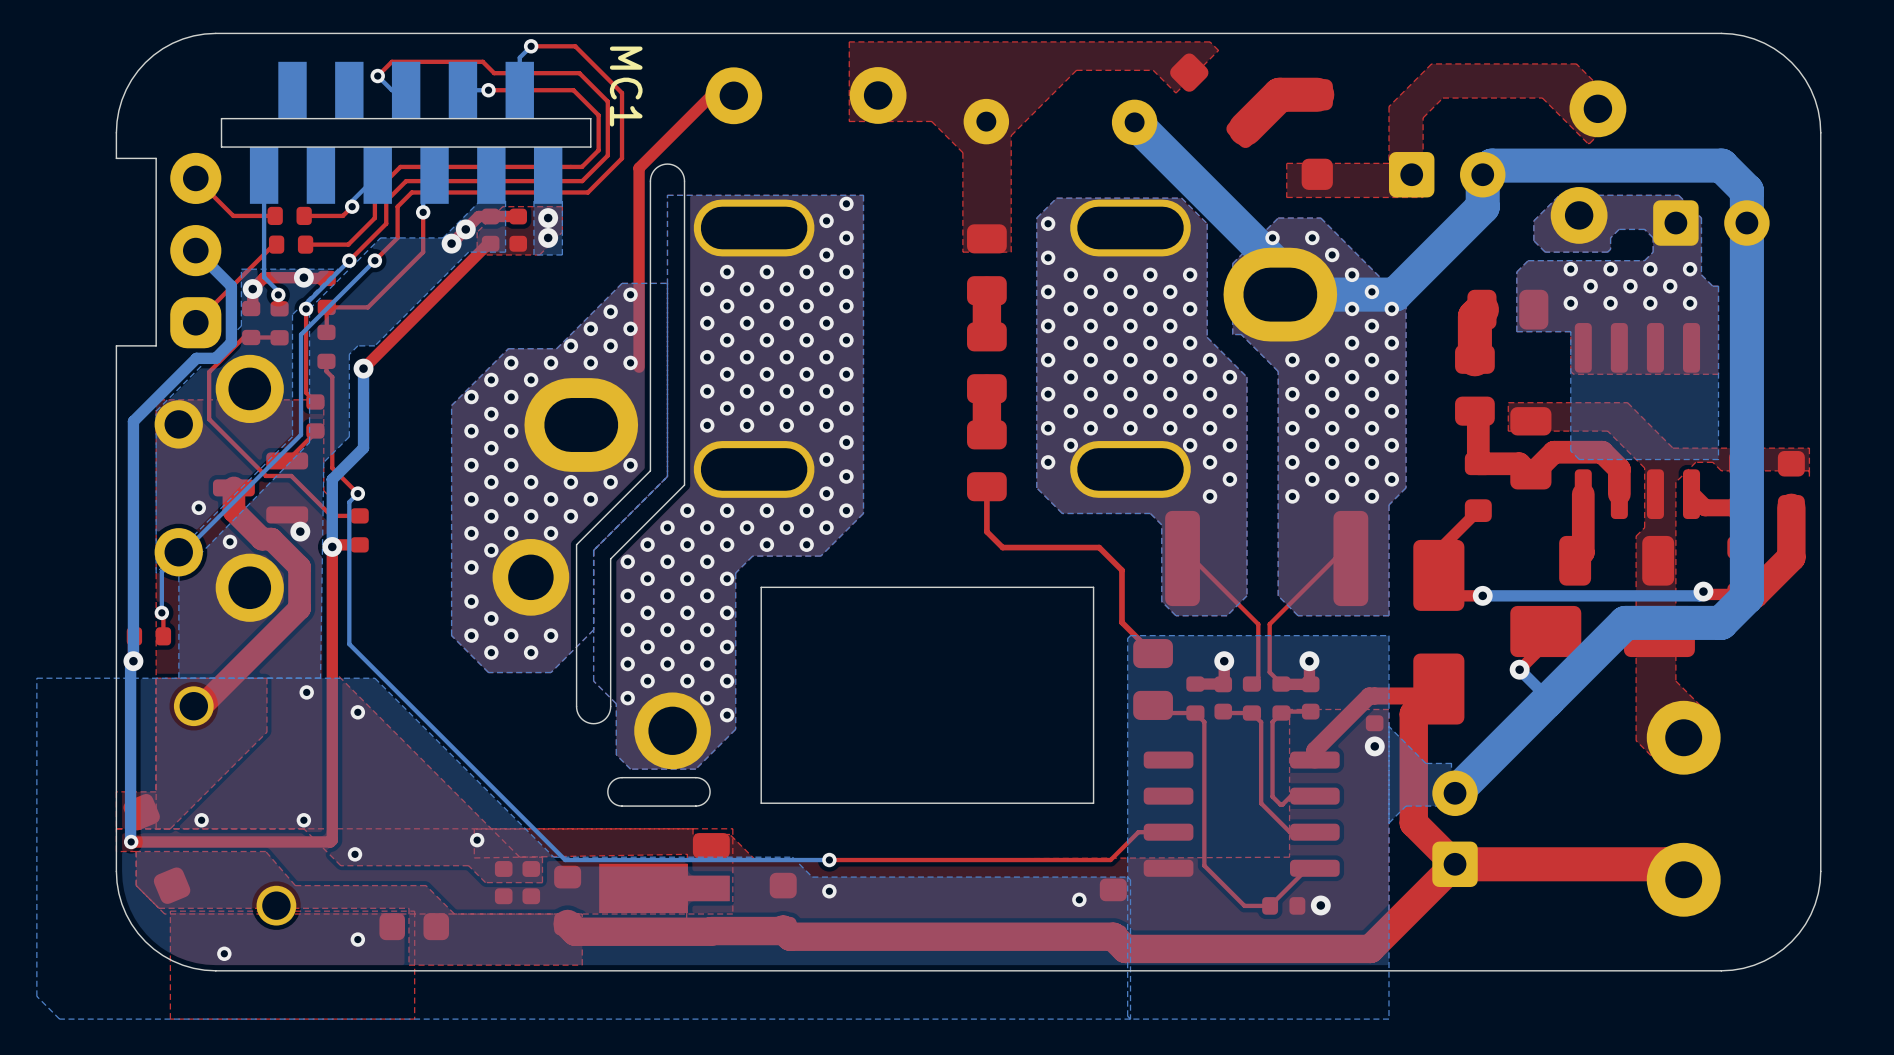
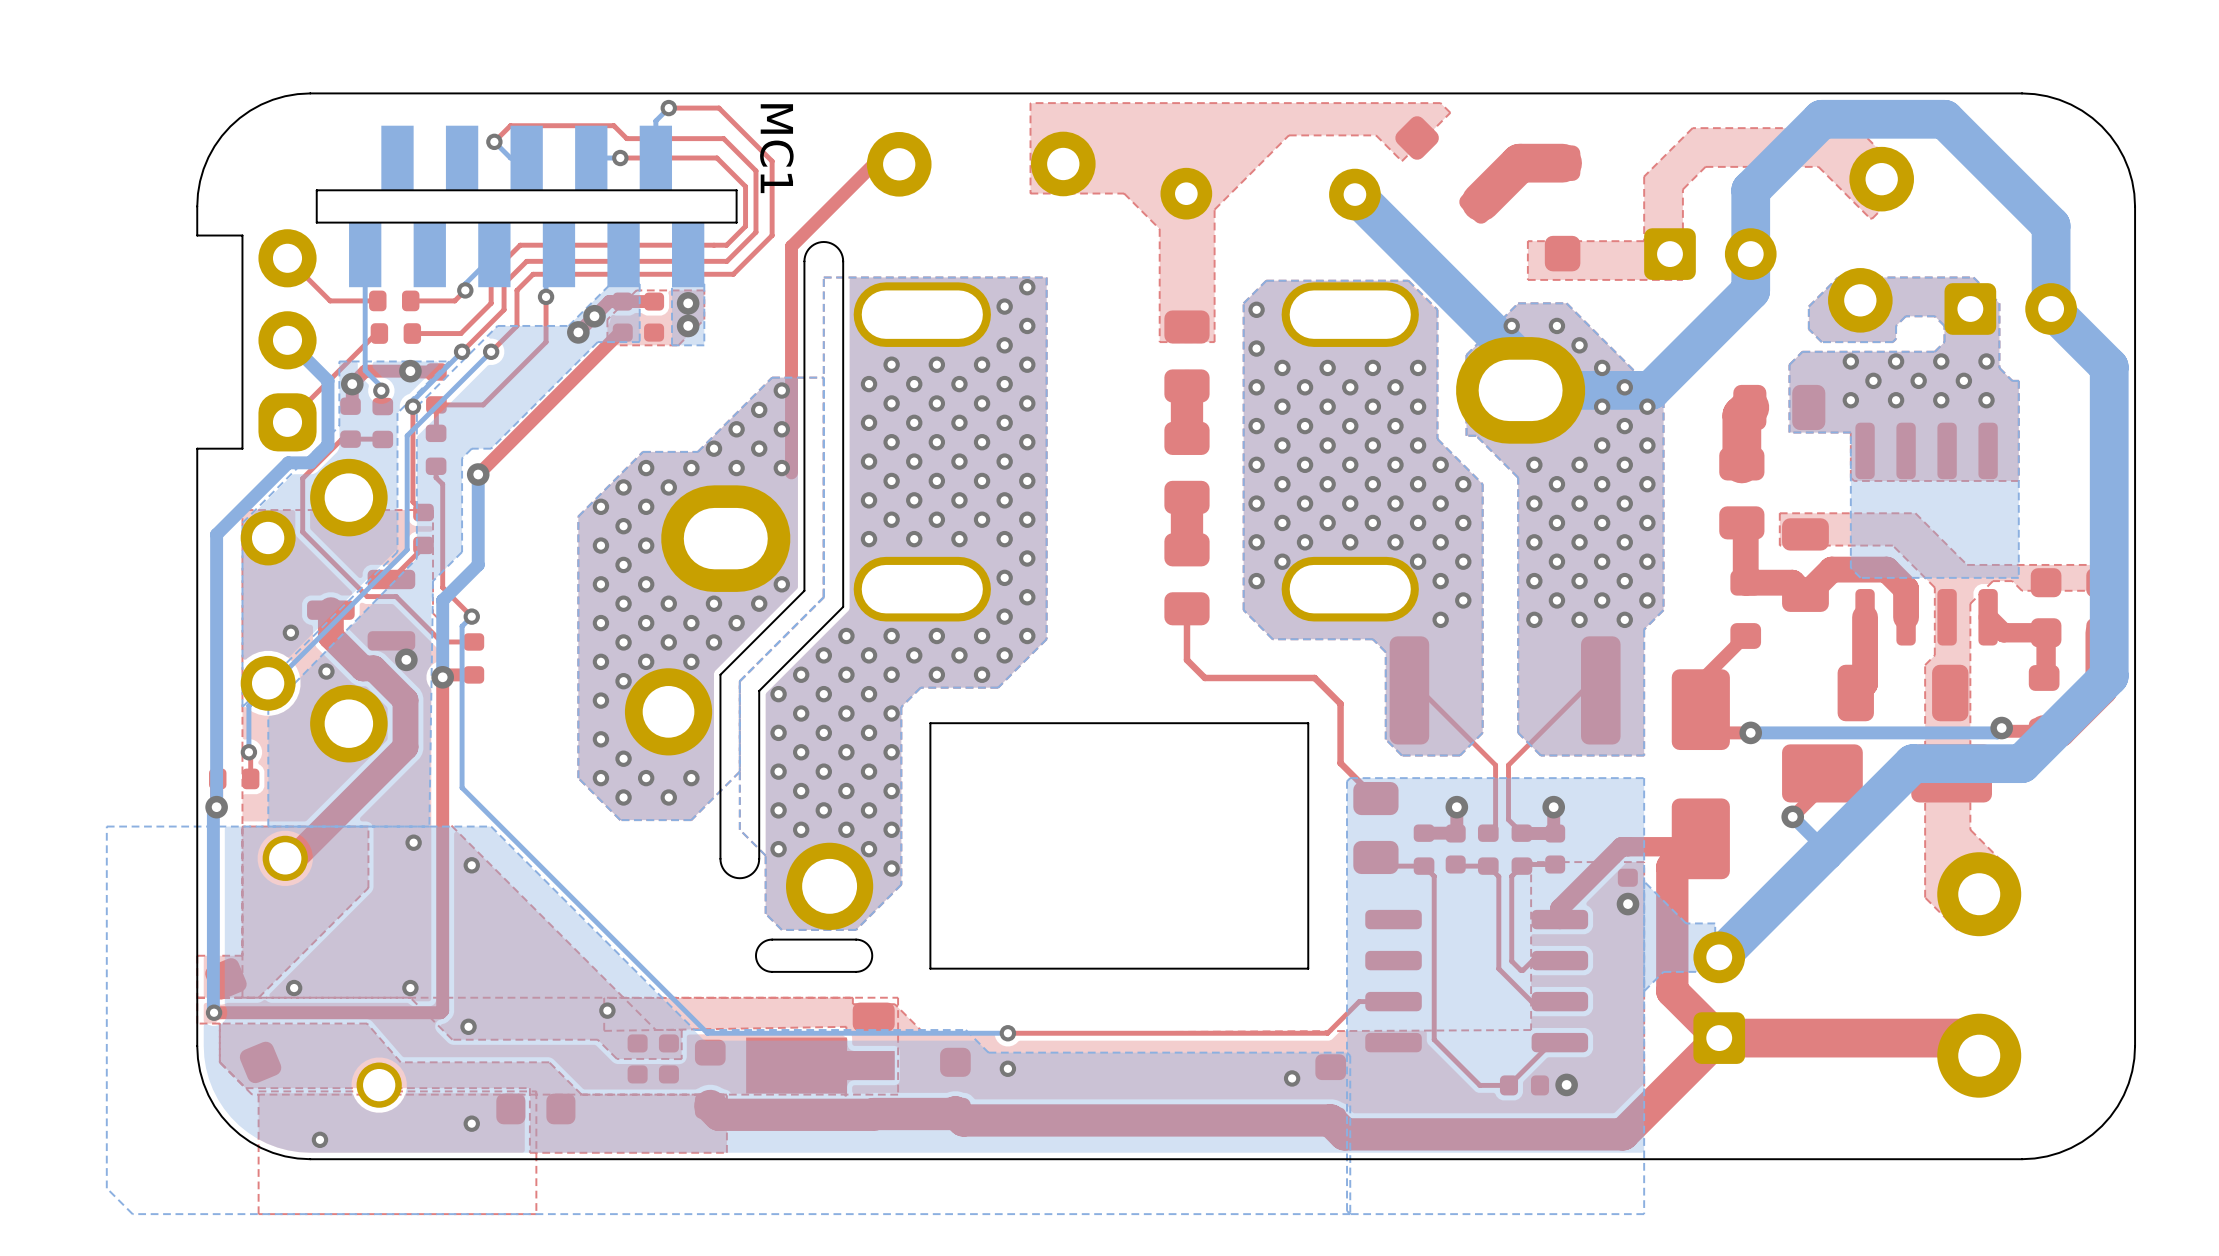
bottom track: (1482, 174) (1491, 165) (1721, 165) (1746, 190) -> (1750, 254) (1750, 190) (1821, 119) (1944, 119) (2051, 225) (2051, 272)
bottom track: (1746, 223) (1746, 597) -> (2051, 308) (2109, 367) (2109, 676) (2051, 734)

